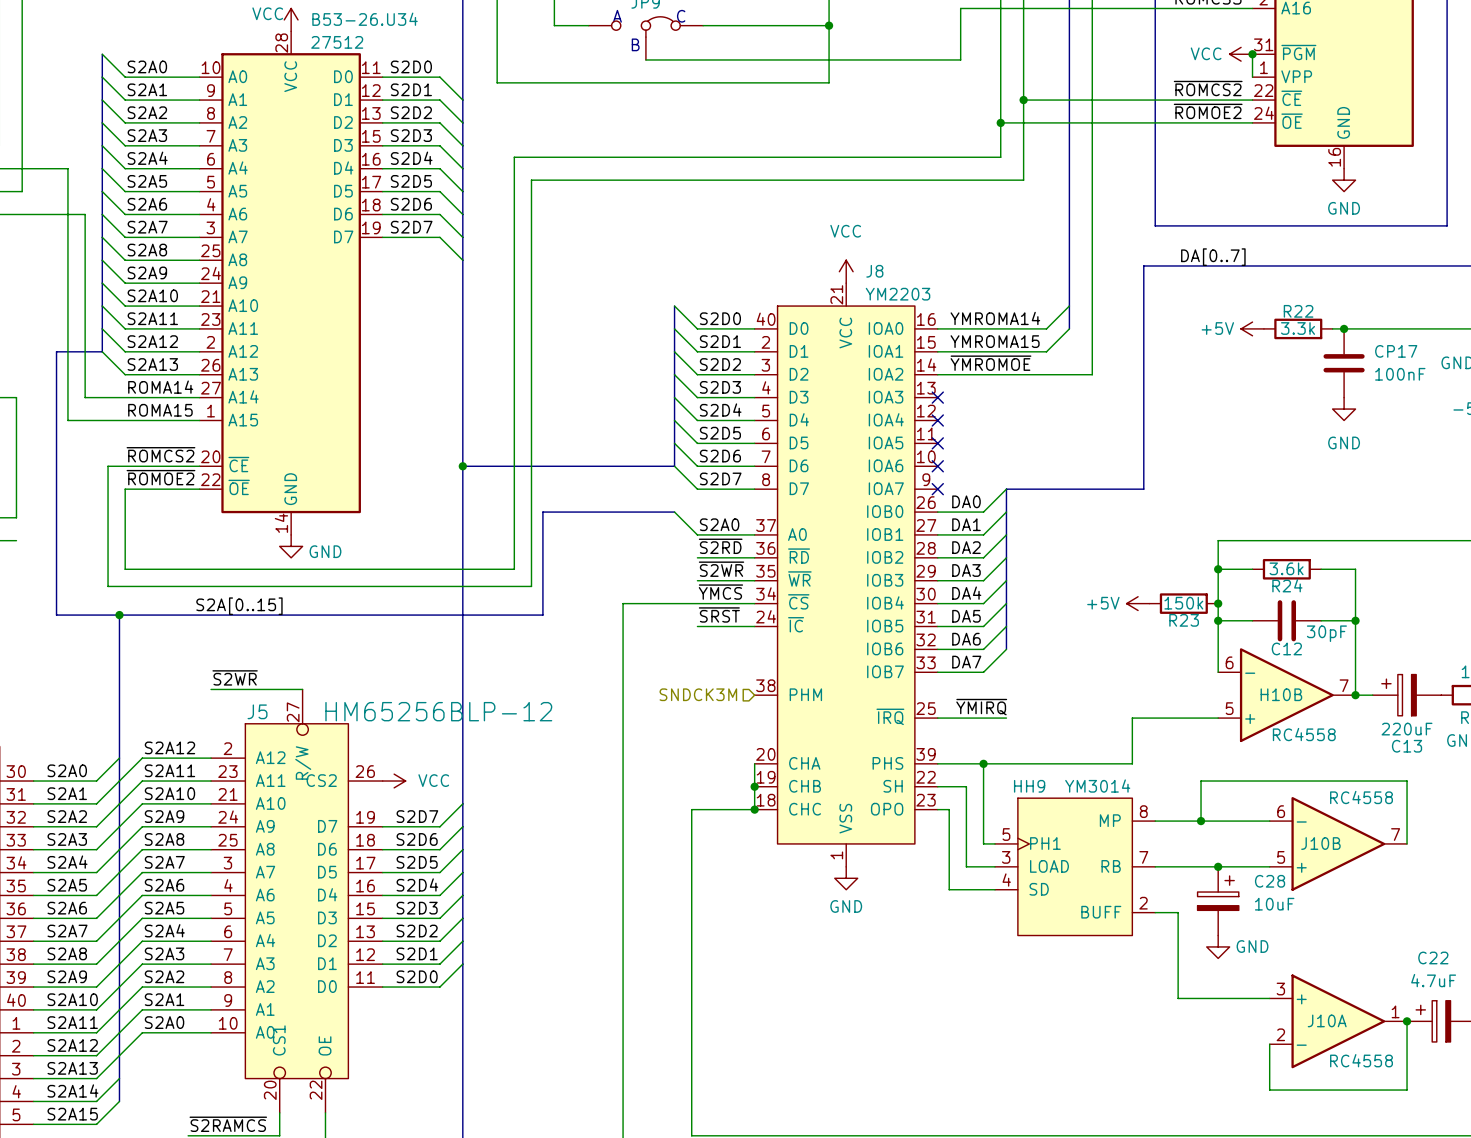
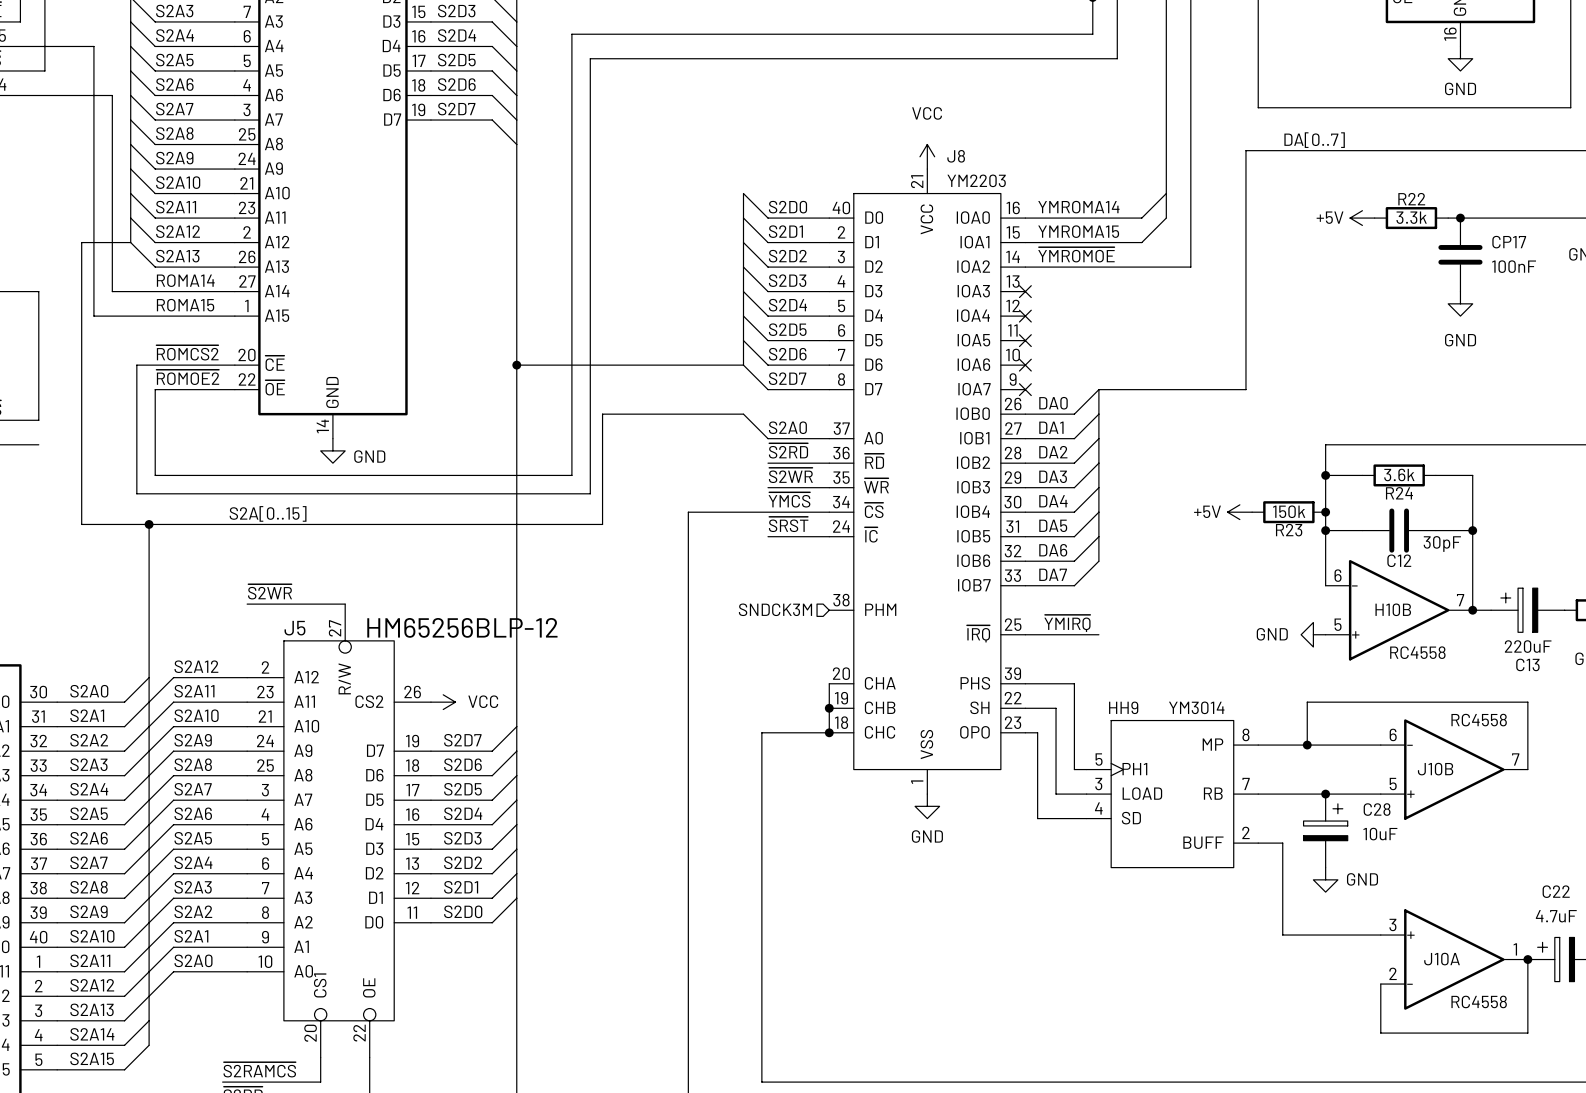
power symbol: none -> GND (1313, 634)
wire: (1218, 718) (1132, 718) (1132, 763) (983, 763) -> none
junction: (983, 763) -> none

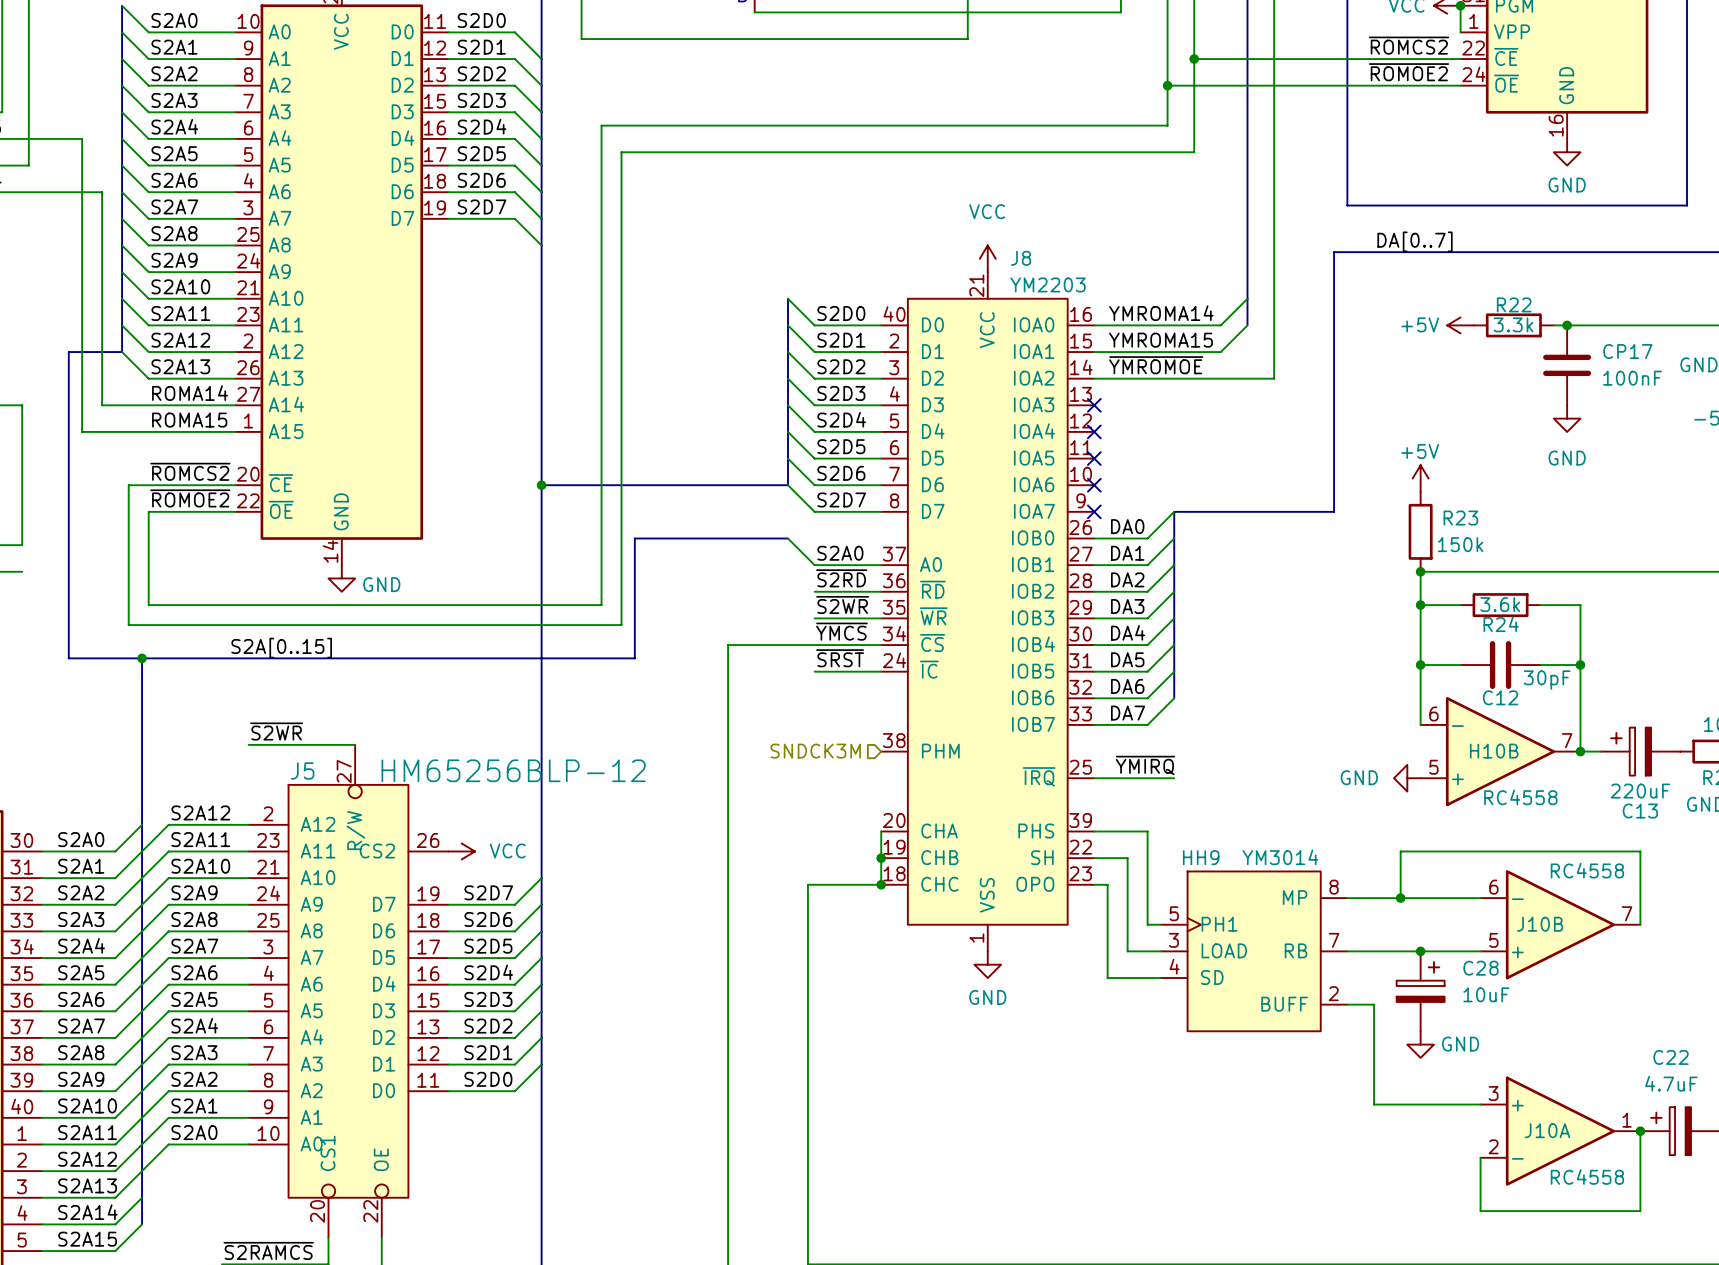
junction: none -> (1420, 571)
R23 value position: 150k (1289, 511) -> 150k (1460, 544)
power symbol rotation: 0° (1239, 512) -> 90° clockwise (1420, 478)
power symbol position: +5V (1239, 512) -> +5V (1420, 478)
R23 rotation: 0° (1288, 512) -> 90° clockwise (1420, 531)
R23 position: (1288, 512) -> (1420, 531)
junction: (1325, 512) -> none
R23 name position: R23 (1289, 530) -> R23 (1460, 518)

